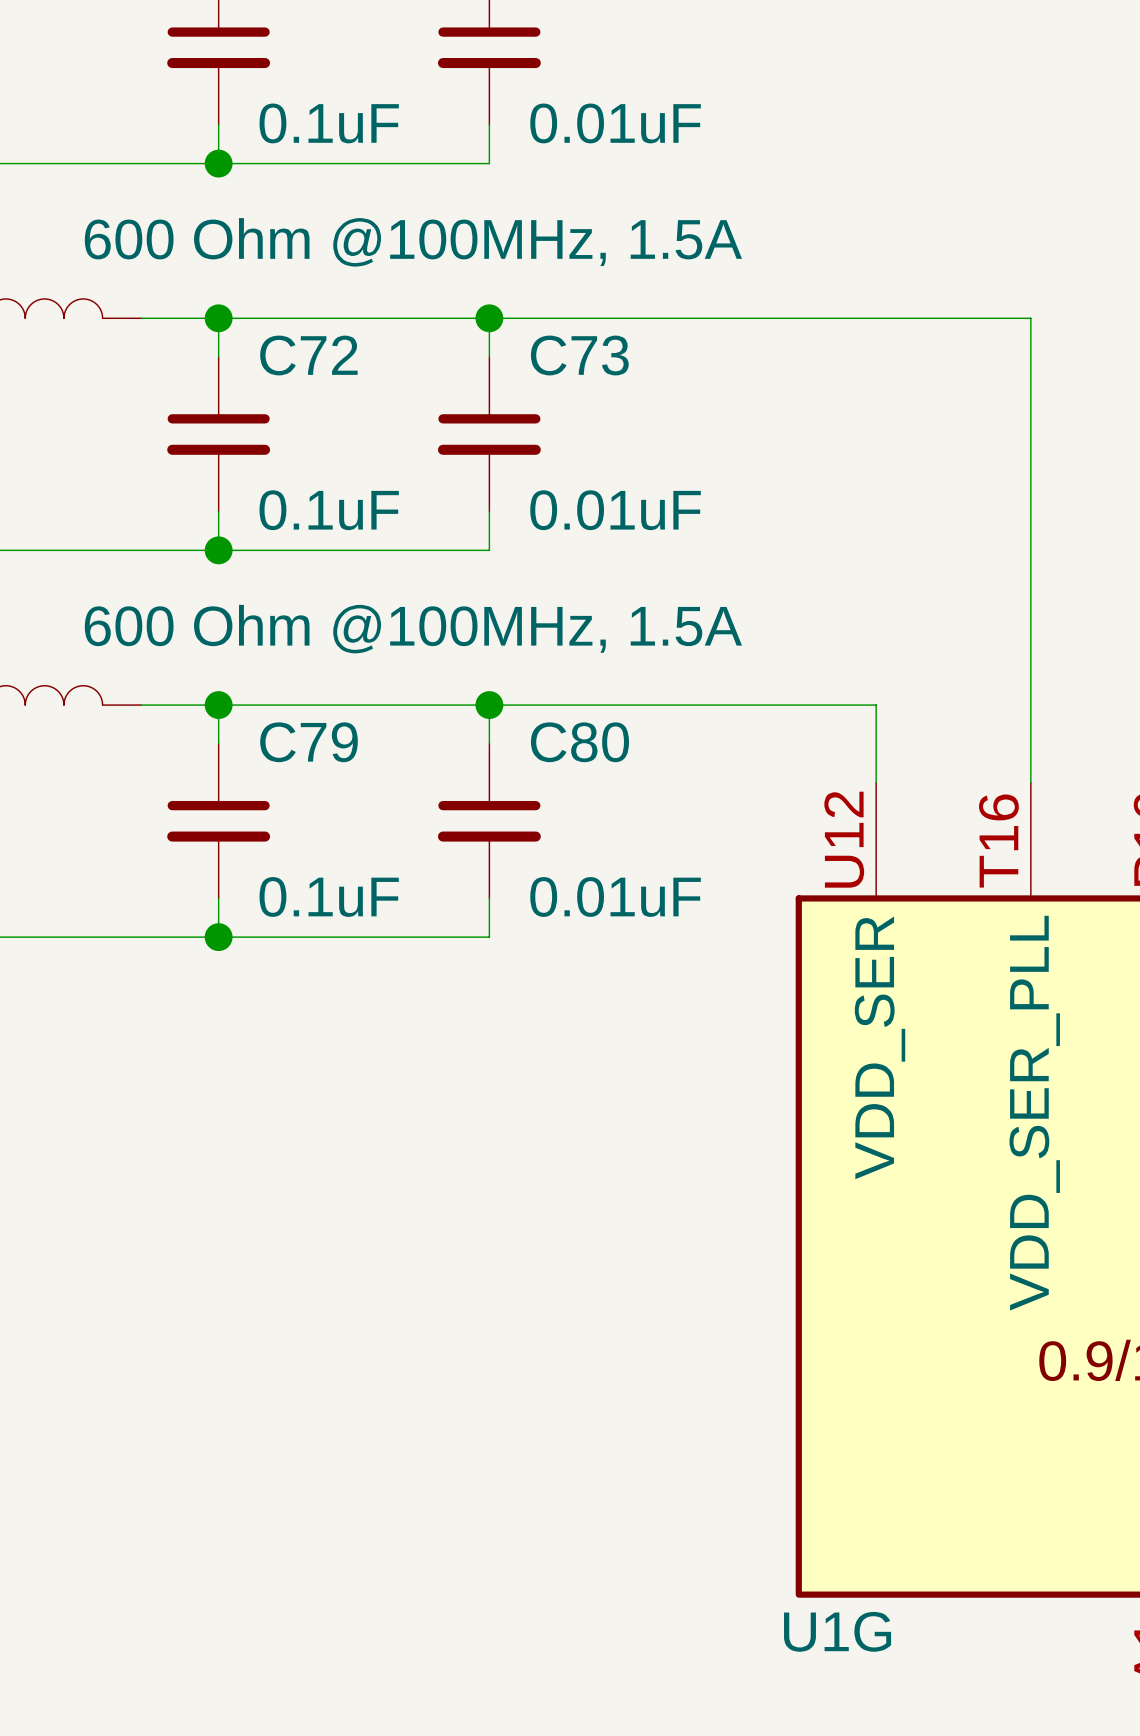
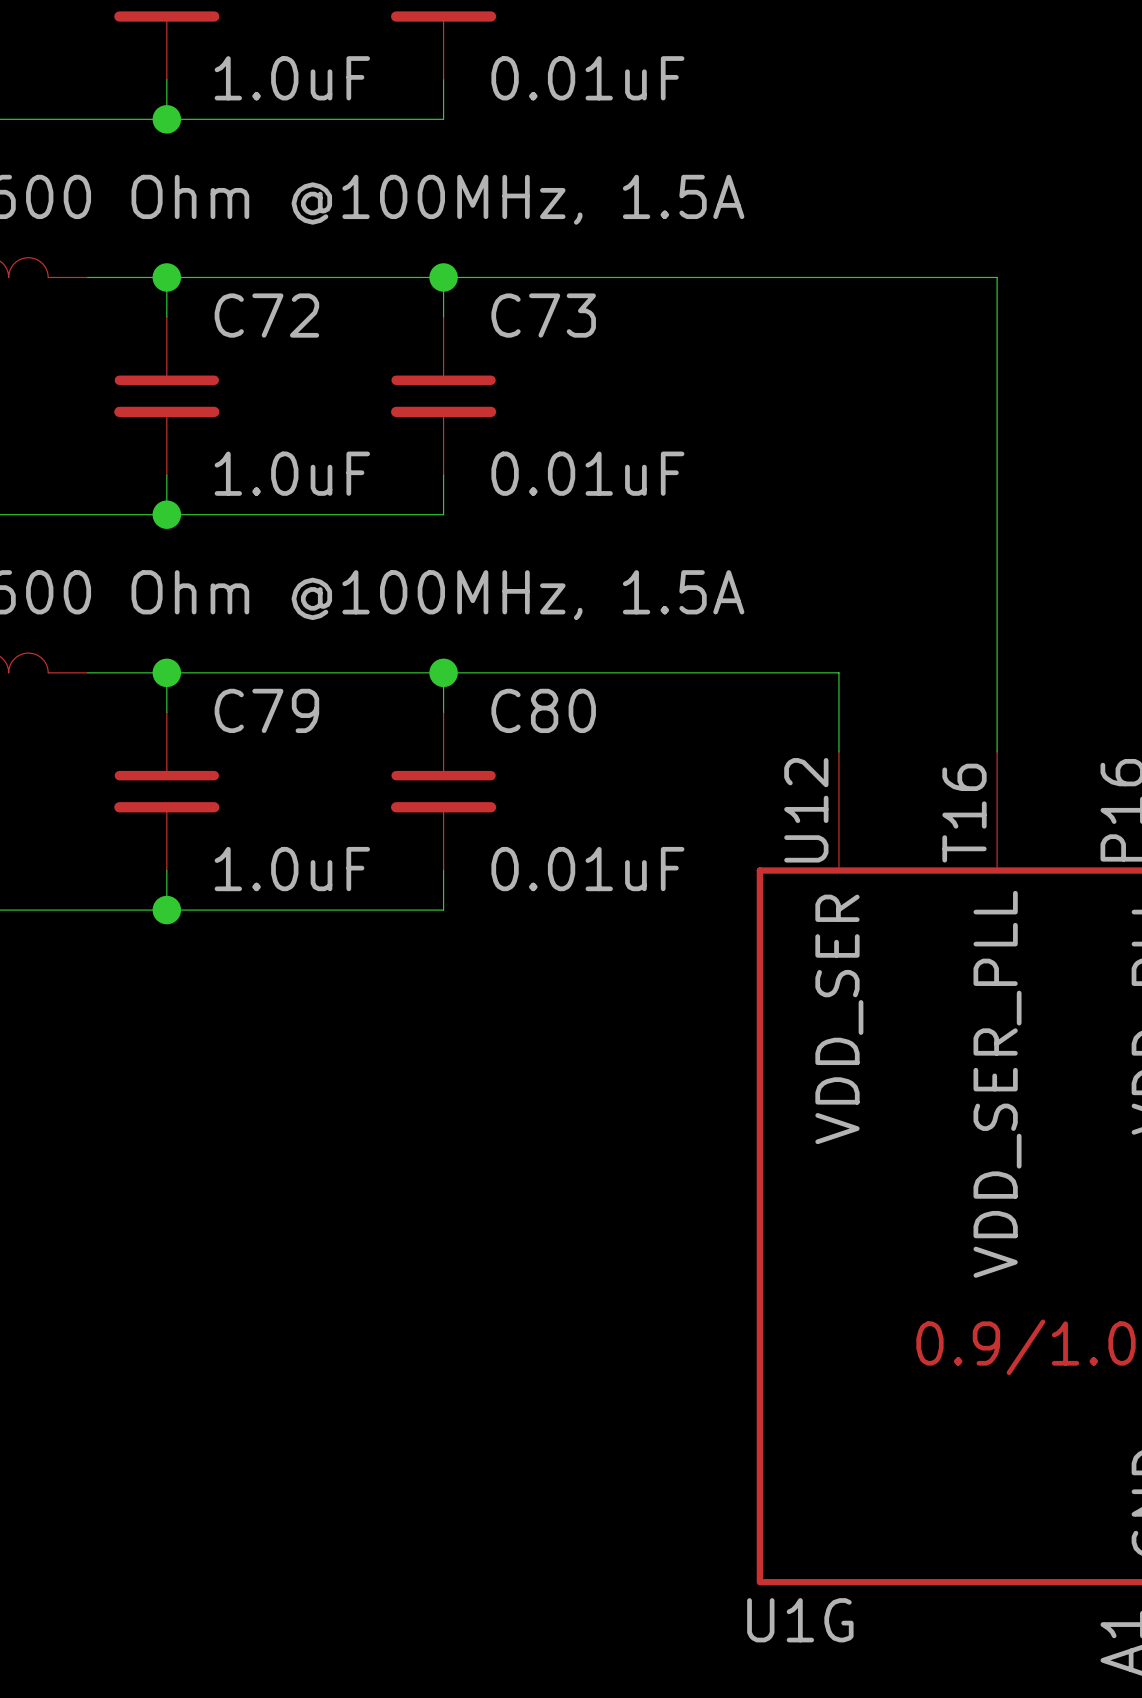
part value: 0.1uF (329, 123) -> 1.0uF (292, 78)
C72 value: 0.1uF (329, 510) -> 1.0uF (292, 473)
C79 value: 0.1uF (329, 896) -> 1.0uF (292, 869)

